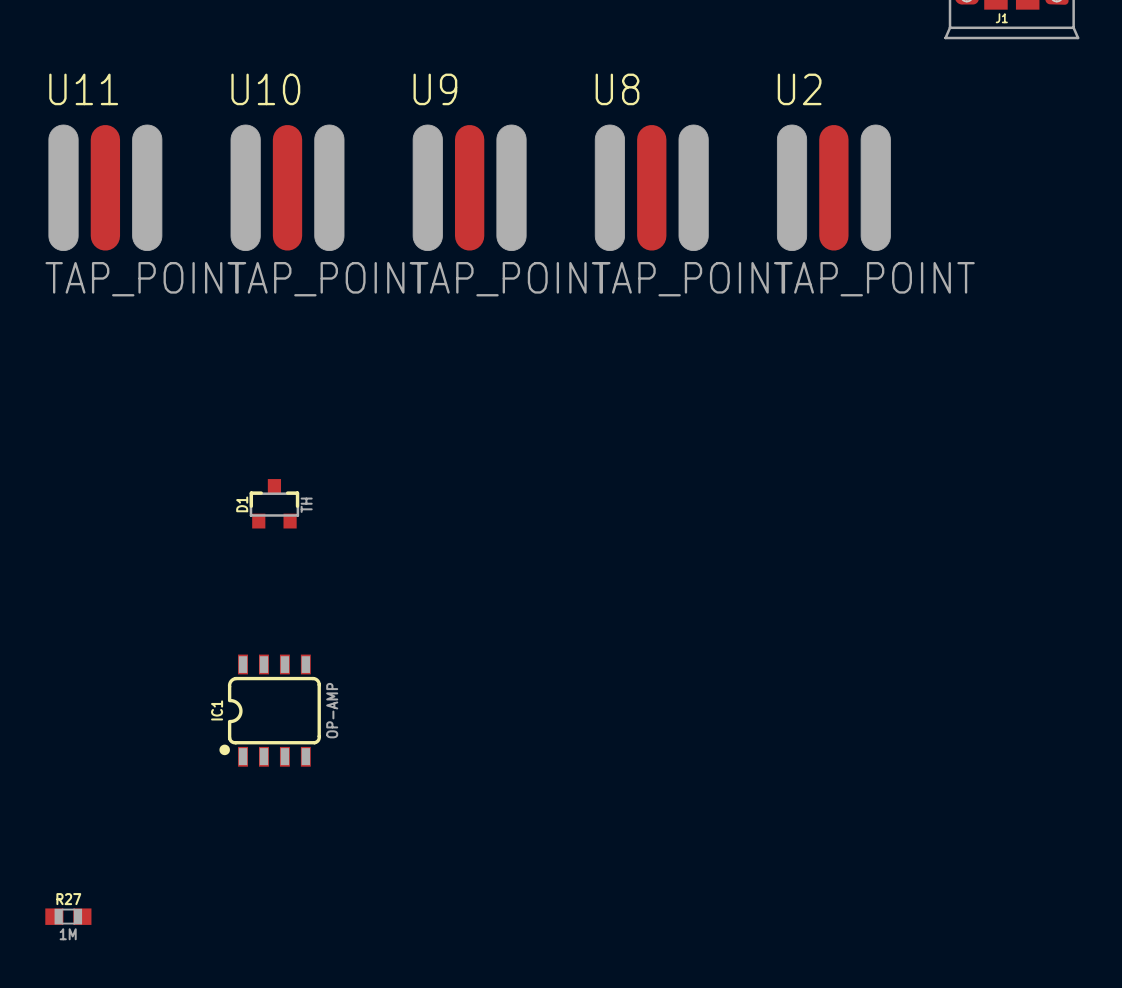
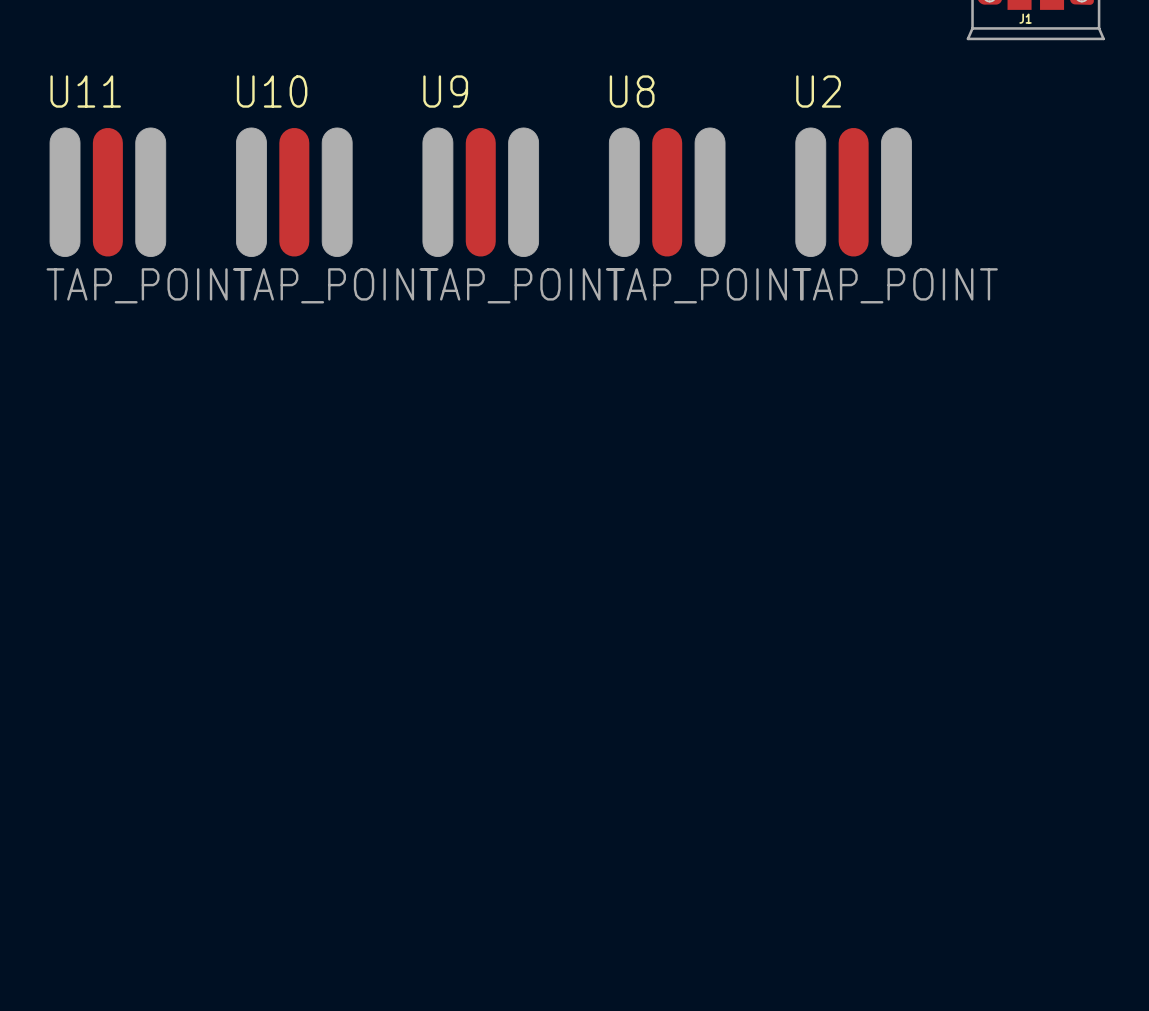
D1: TH (274, 503) -> none
IC1: OP-AMP (270, 710) -> none
R27: 1M (68, 916) -> none

